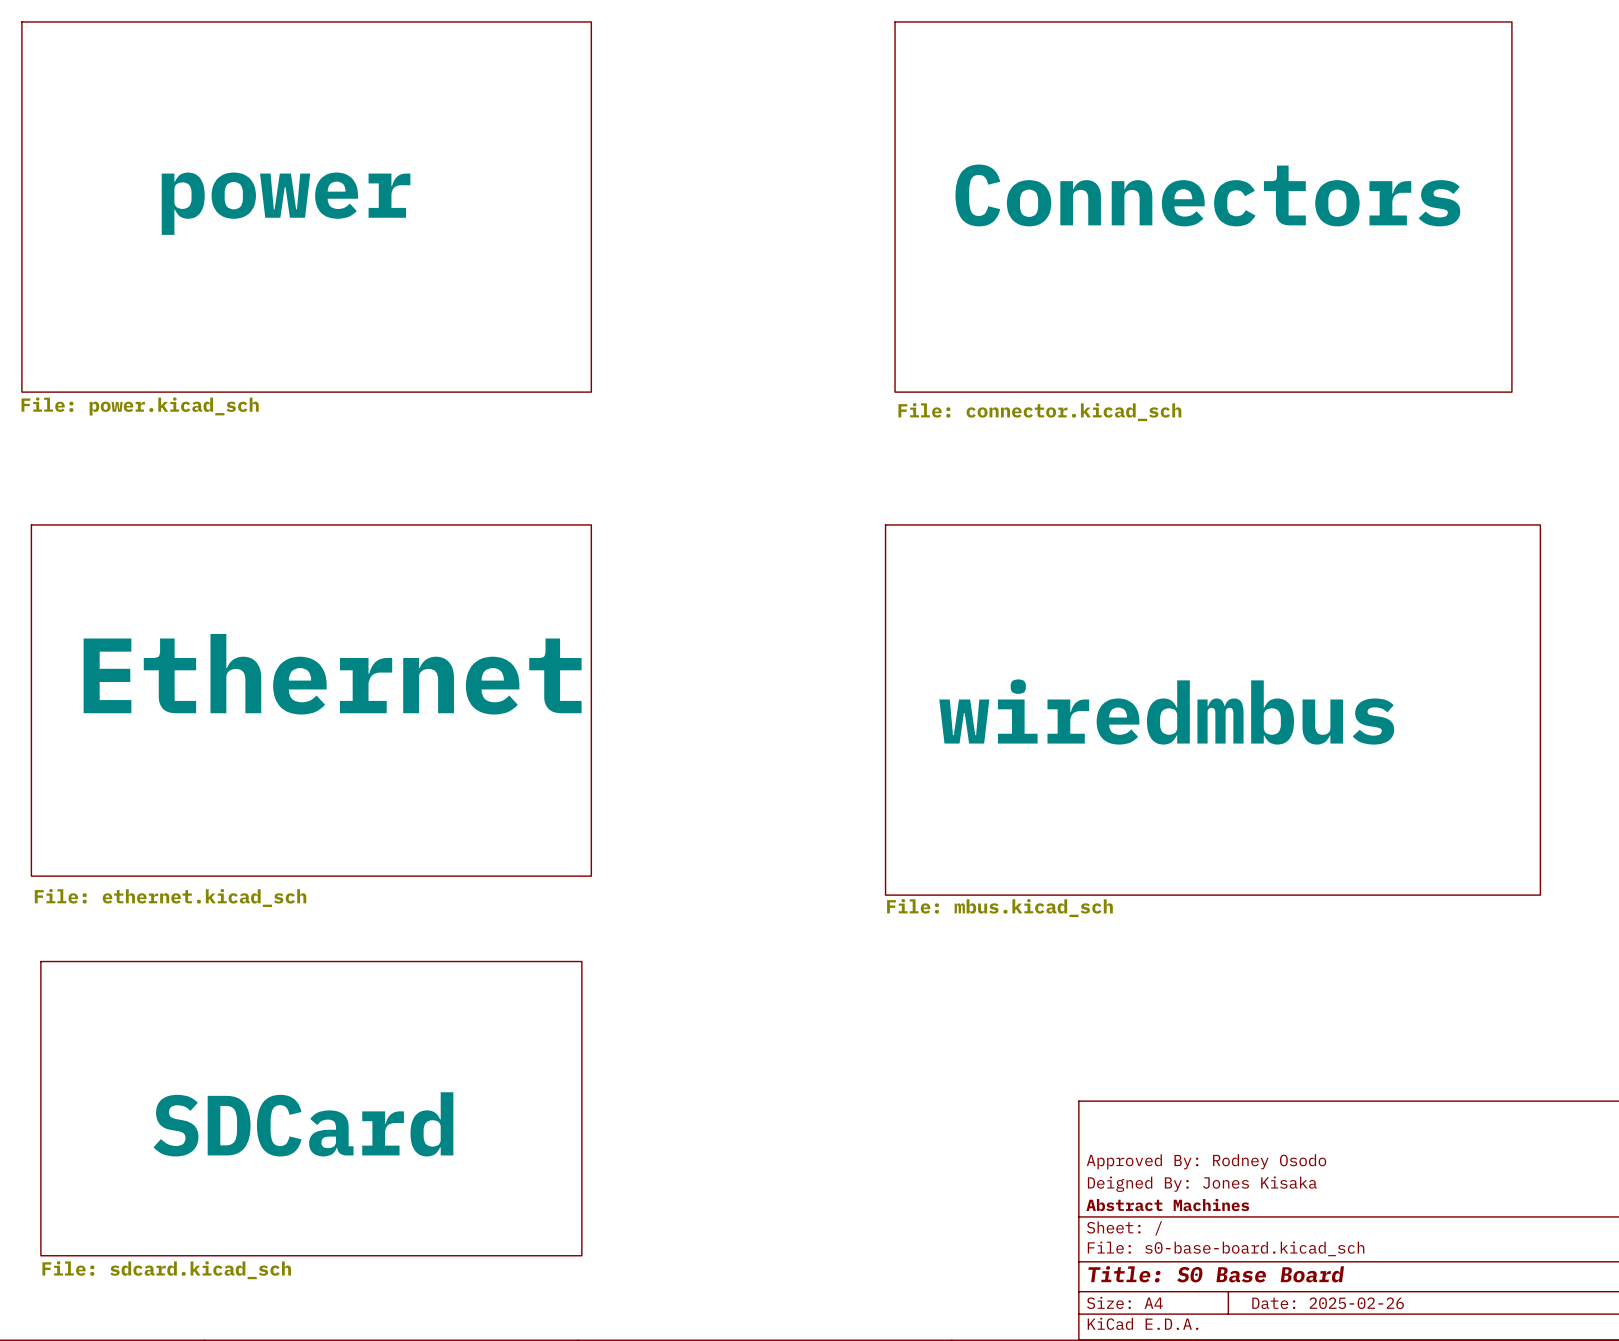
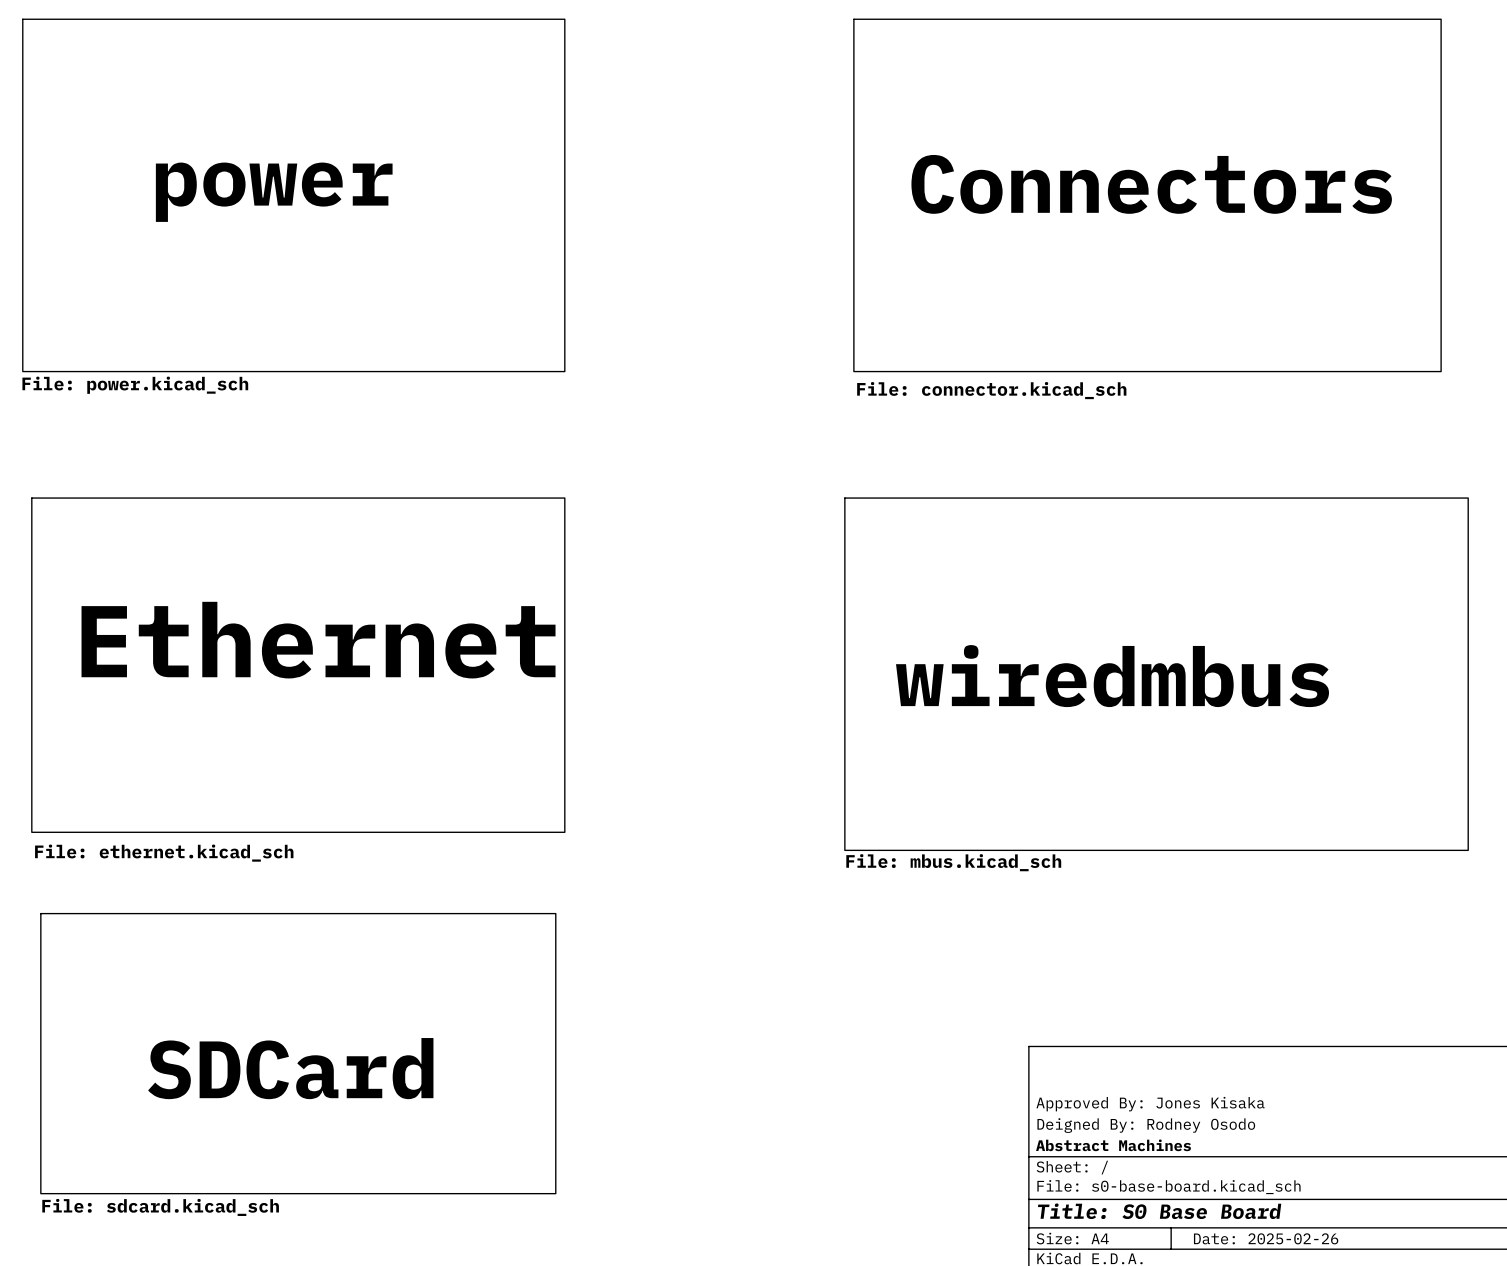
title block: Approved By: Rodney Osodo (1206, 1161) -> Approved By: Jones Kisaka (1150, 1104)
title block: Deigned By: Jones Kisaka (1202, 1184) -> Deigned By: Rodney Osodo (1146, 1125)

